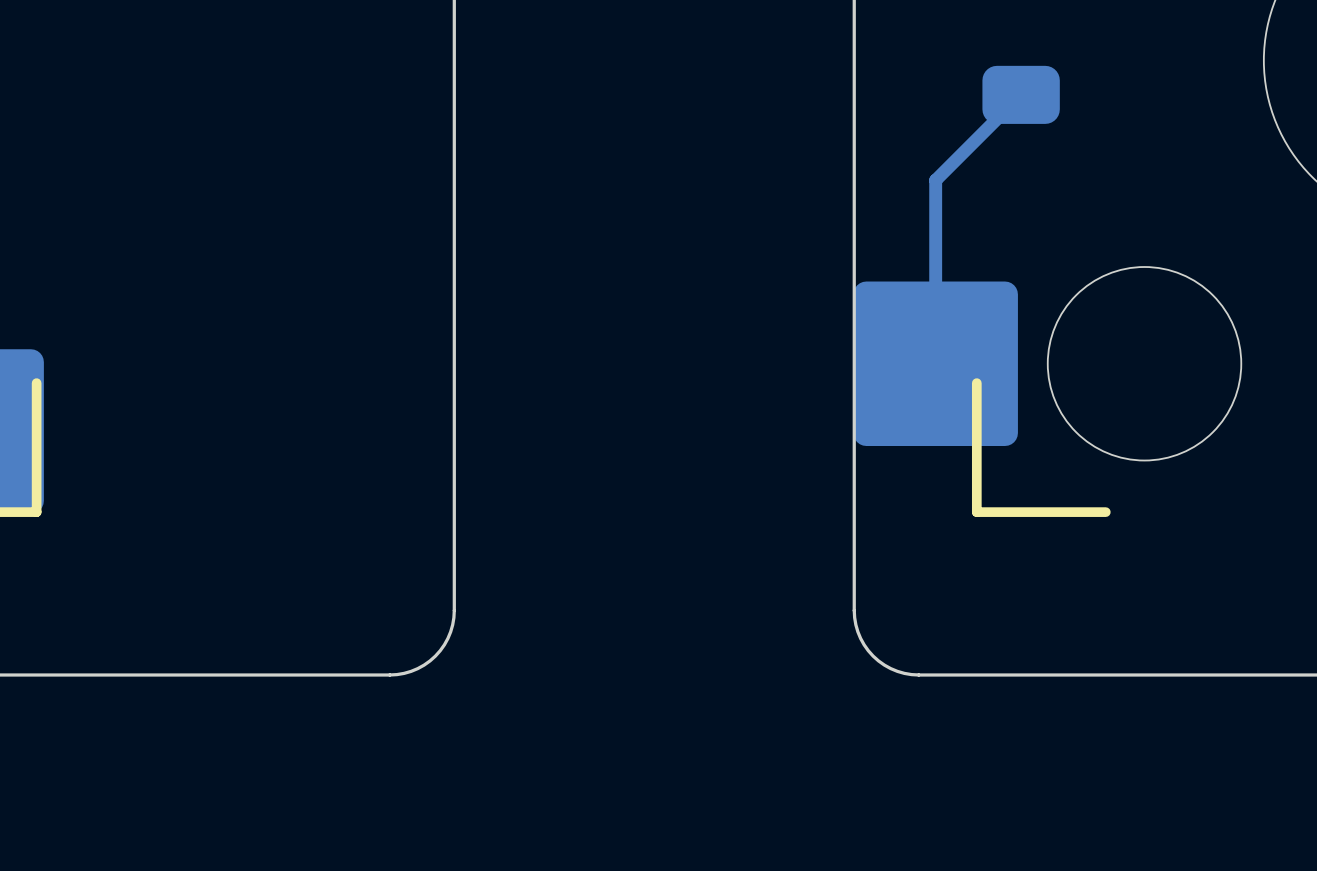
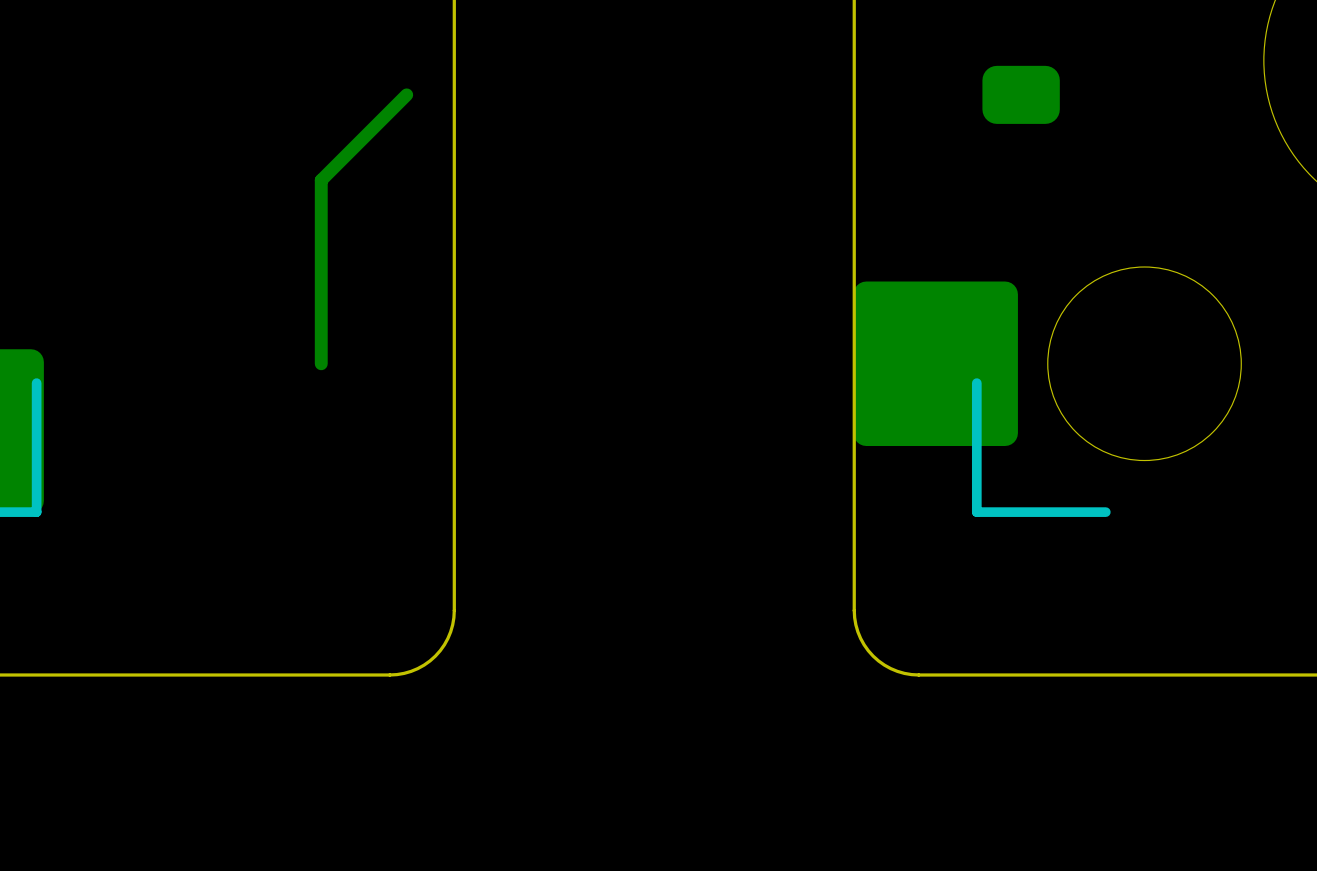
bottom track: (1021, 94) (935, 180) (935, 363) -> (406, 94) (321, 180) (321, 363)

